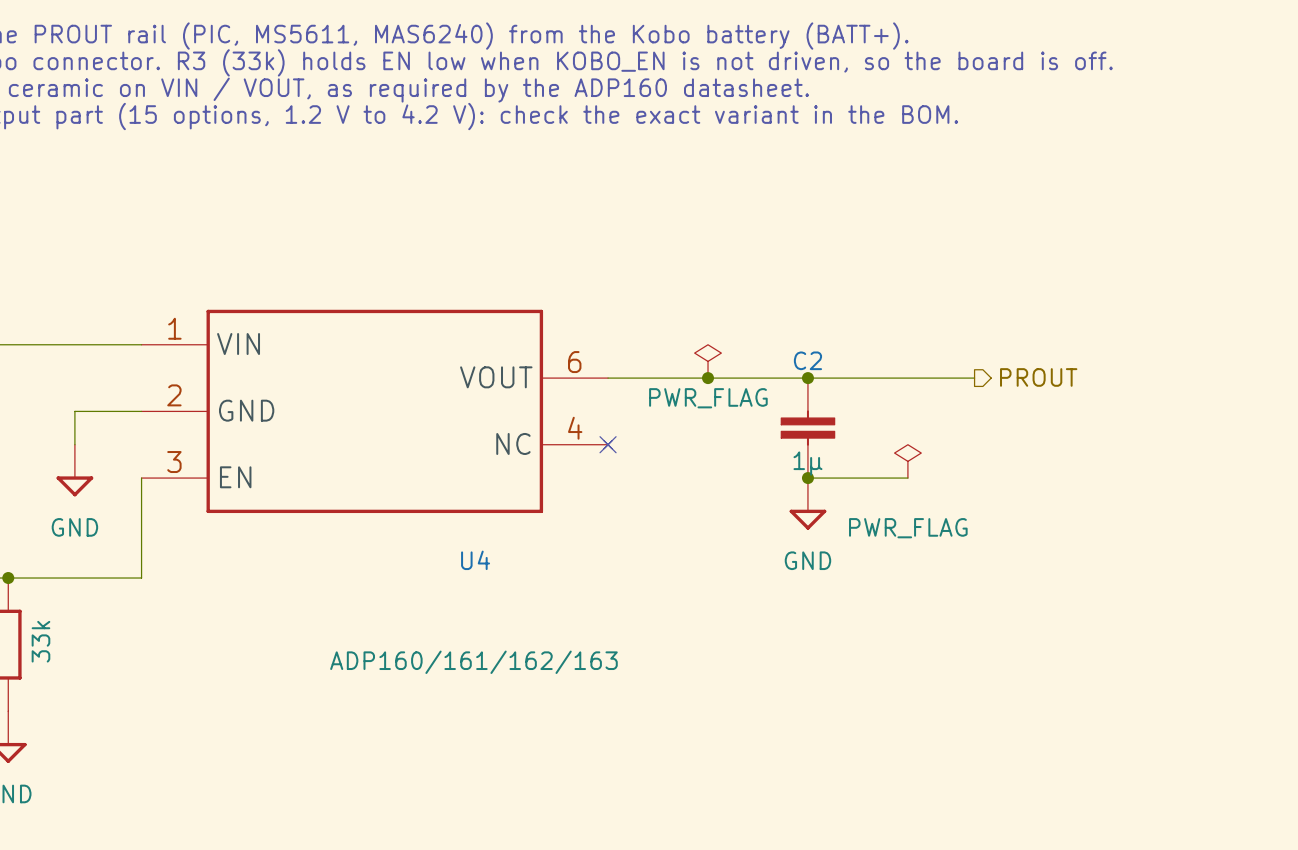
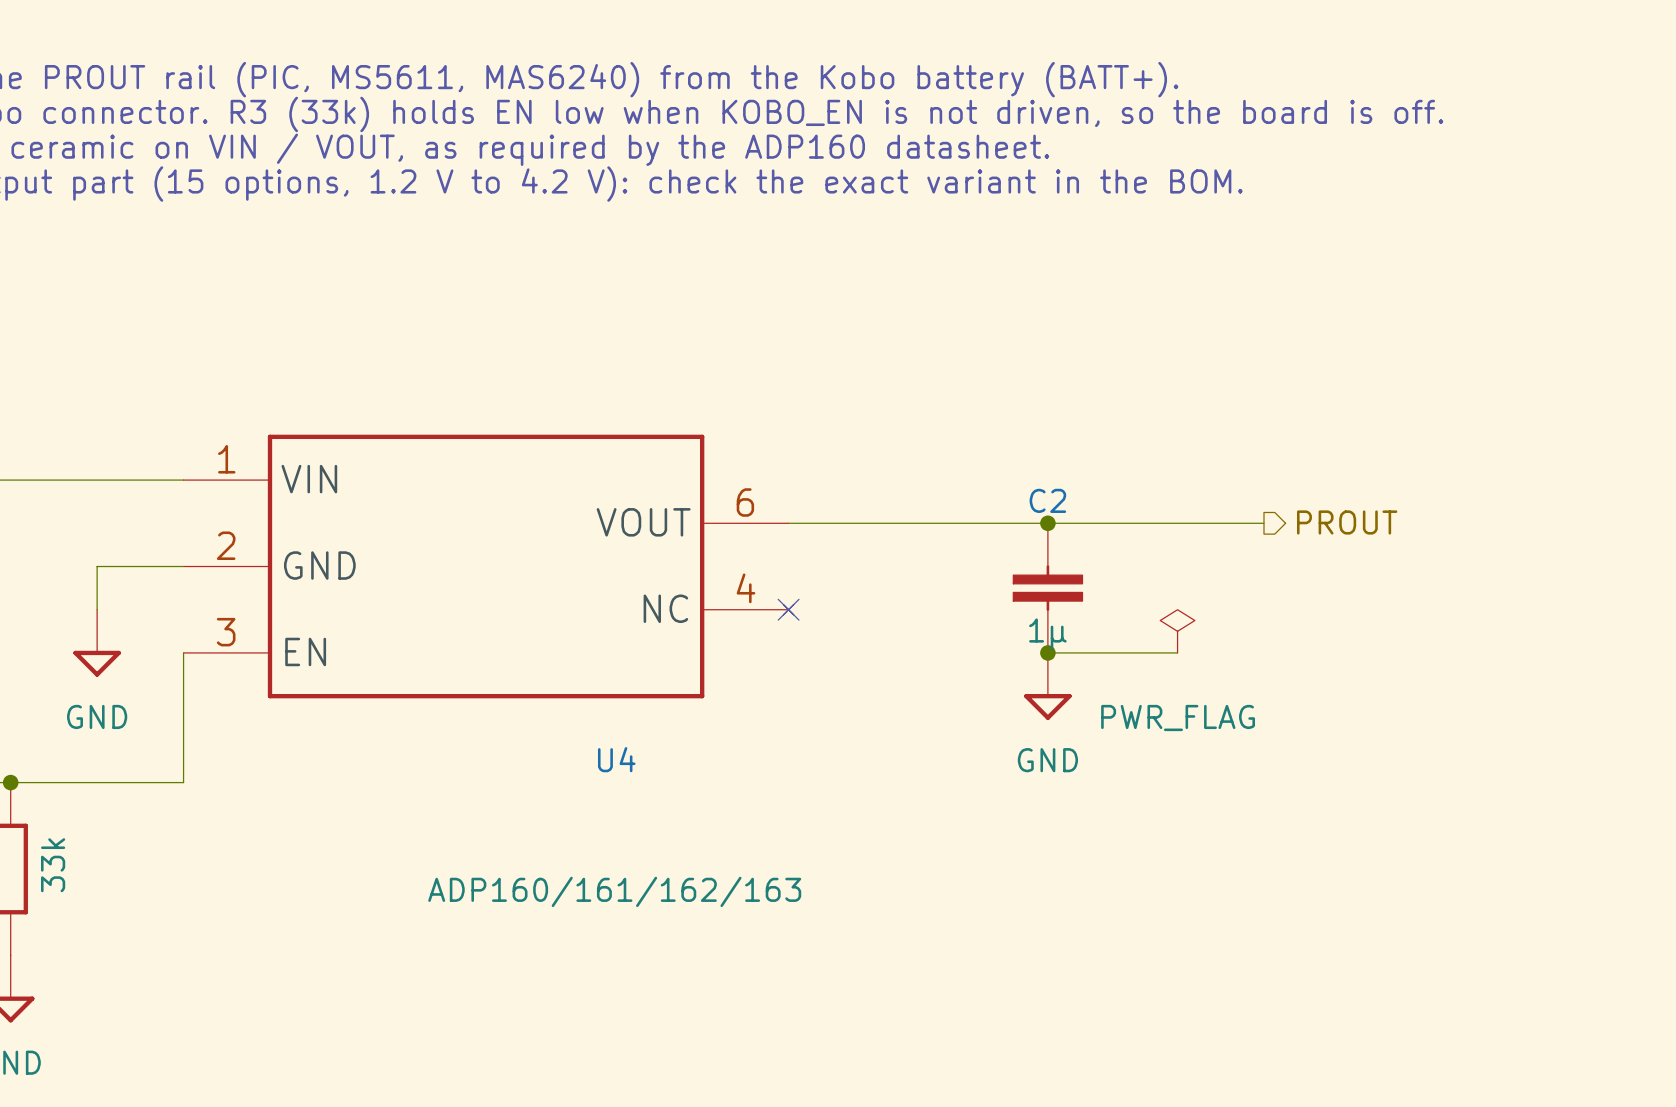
power symbol: PWR_FLAG (708, 361) -> none
junction: (708, 378) -> none

